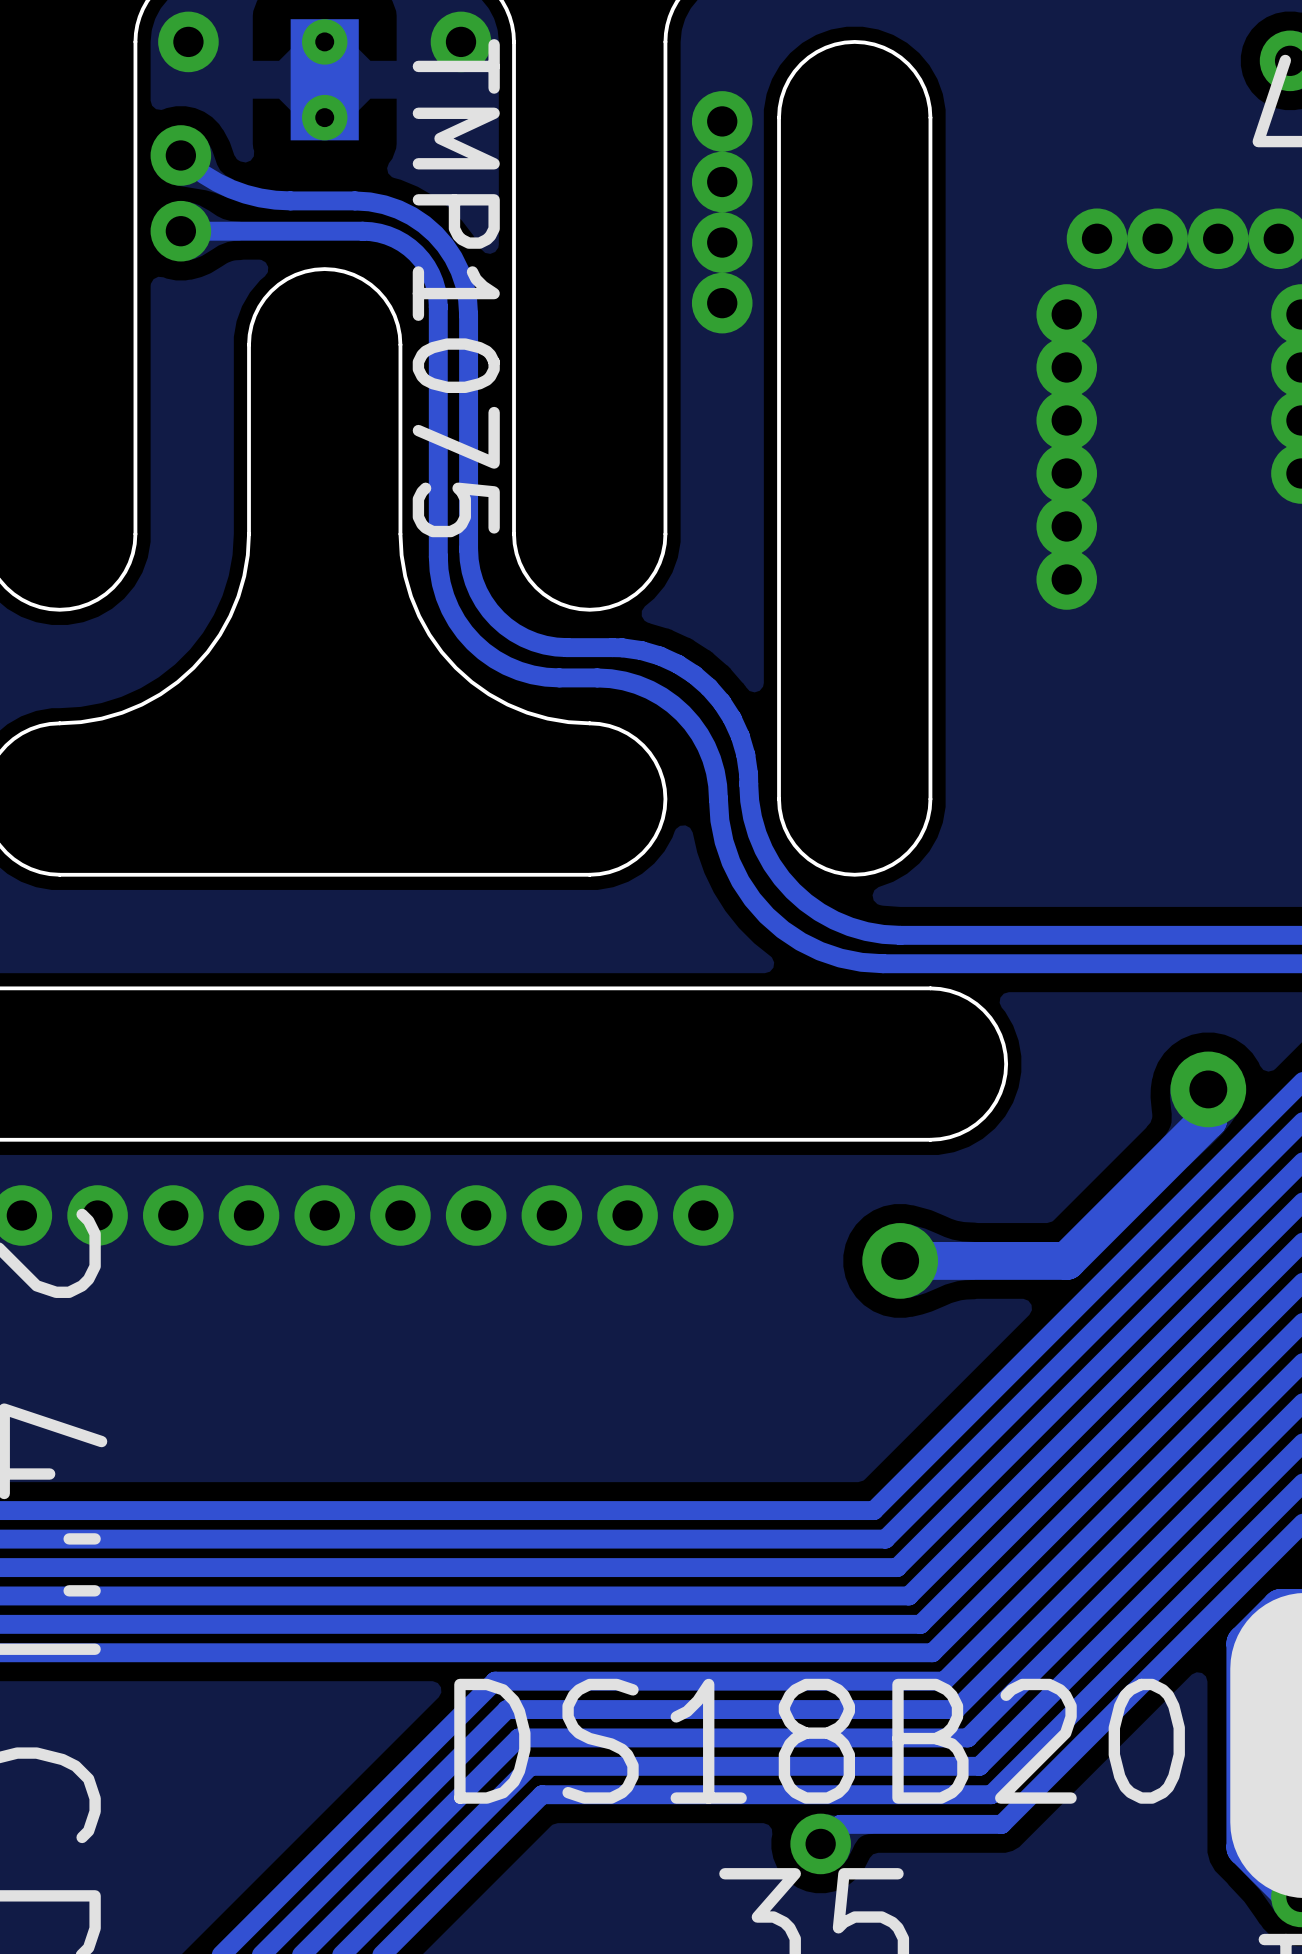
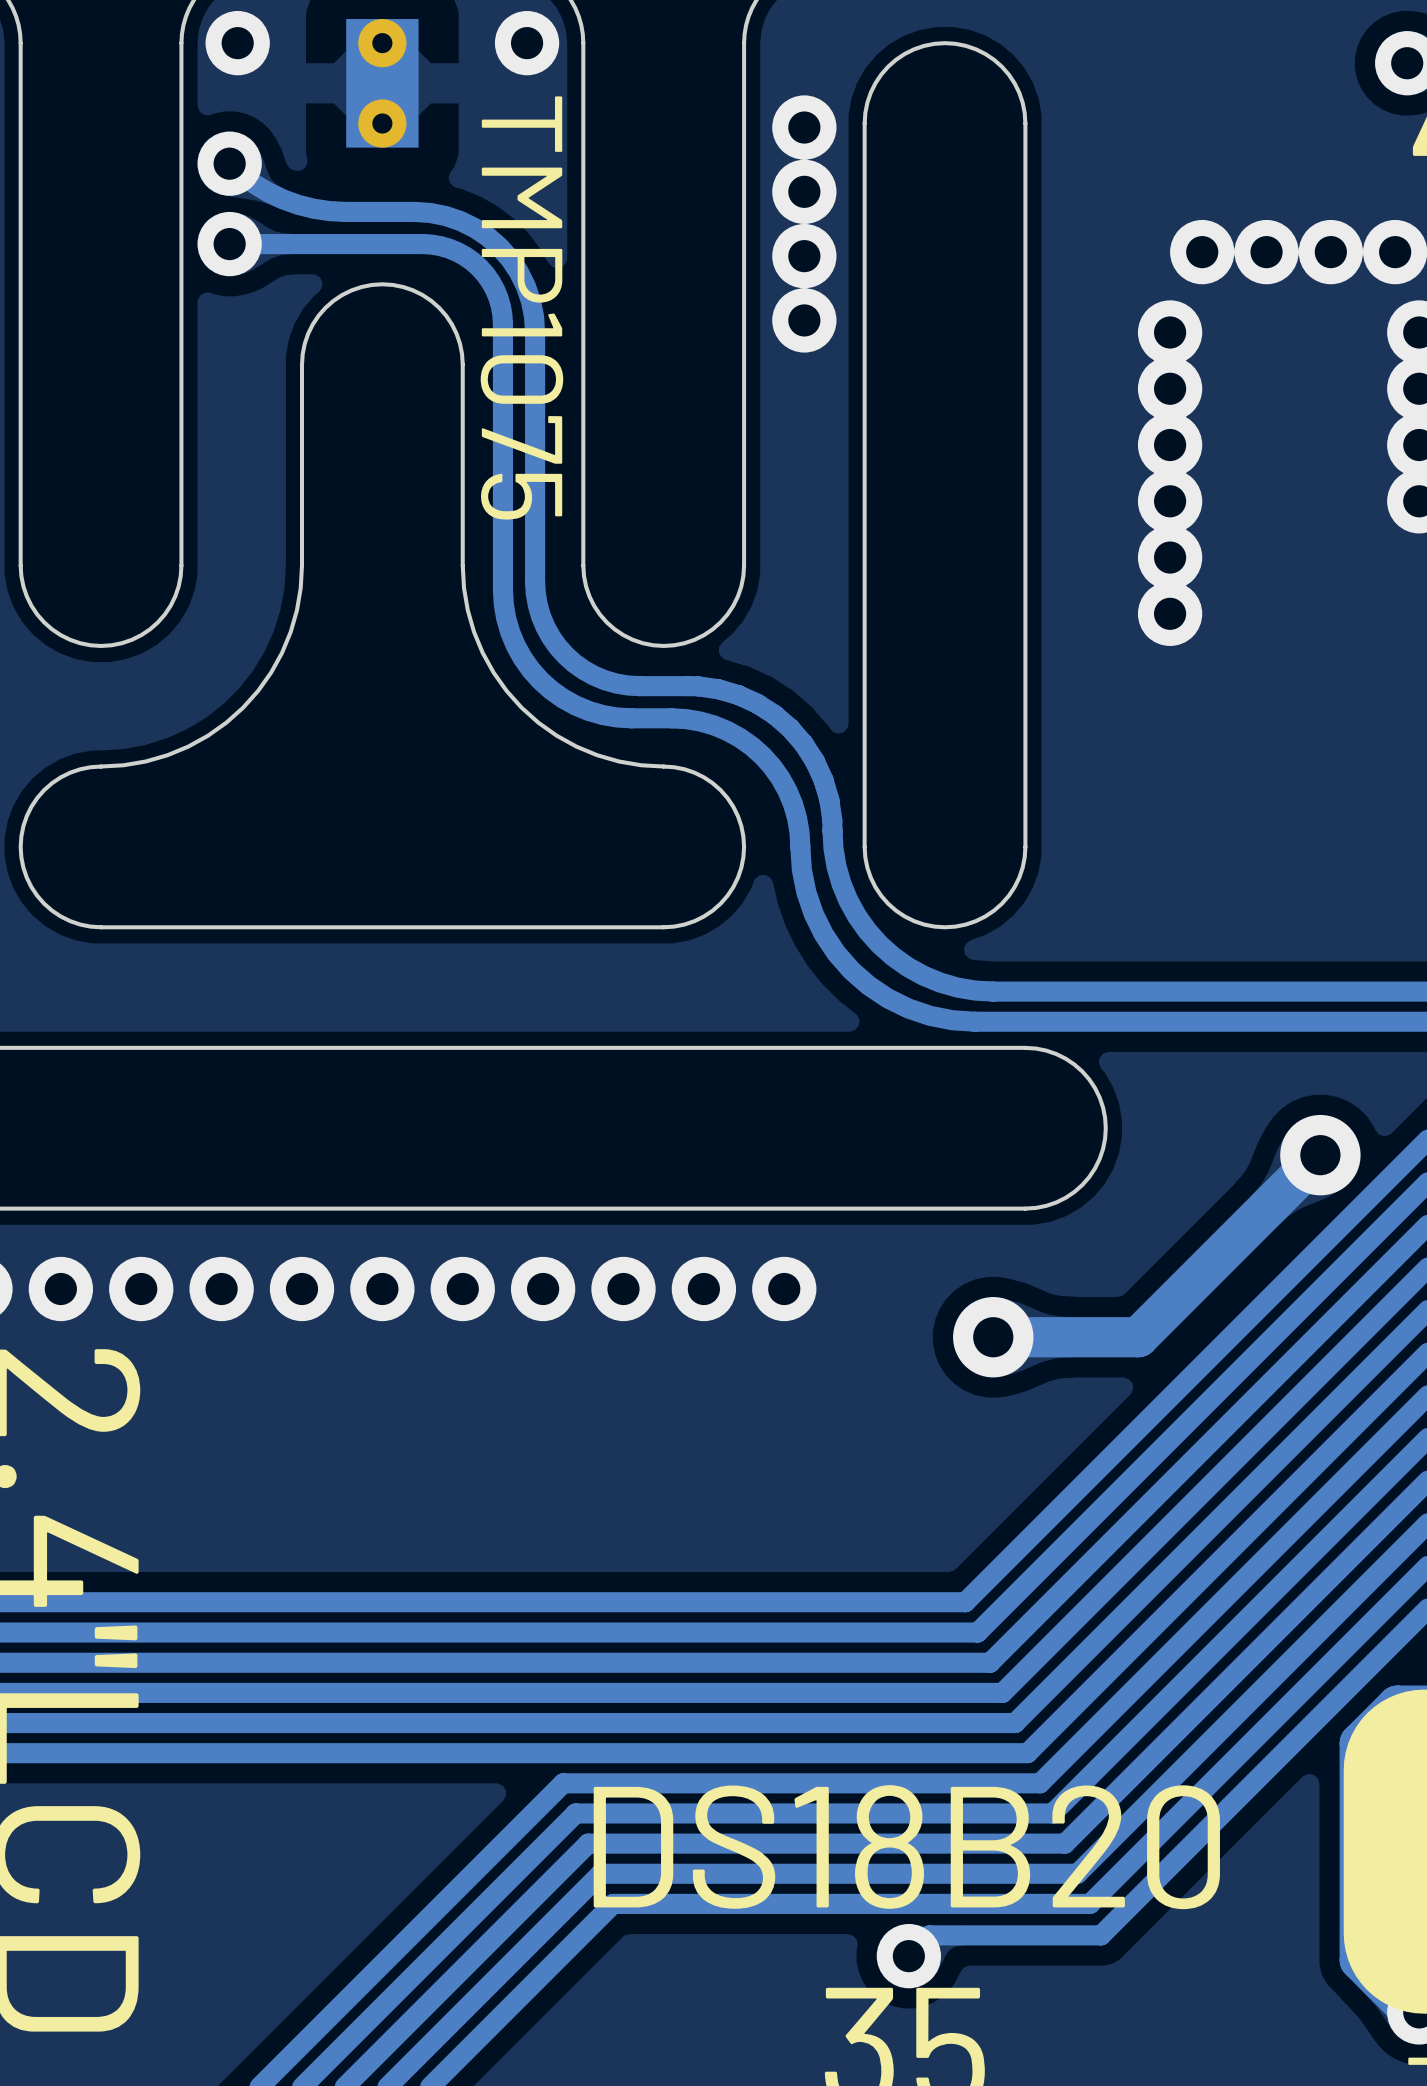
track: (1208, 1089) (1208, 1119) (1066, 1260) (1036, 1260) -> (1320, 1155) (1138, 1337)

